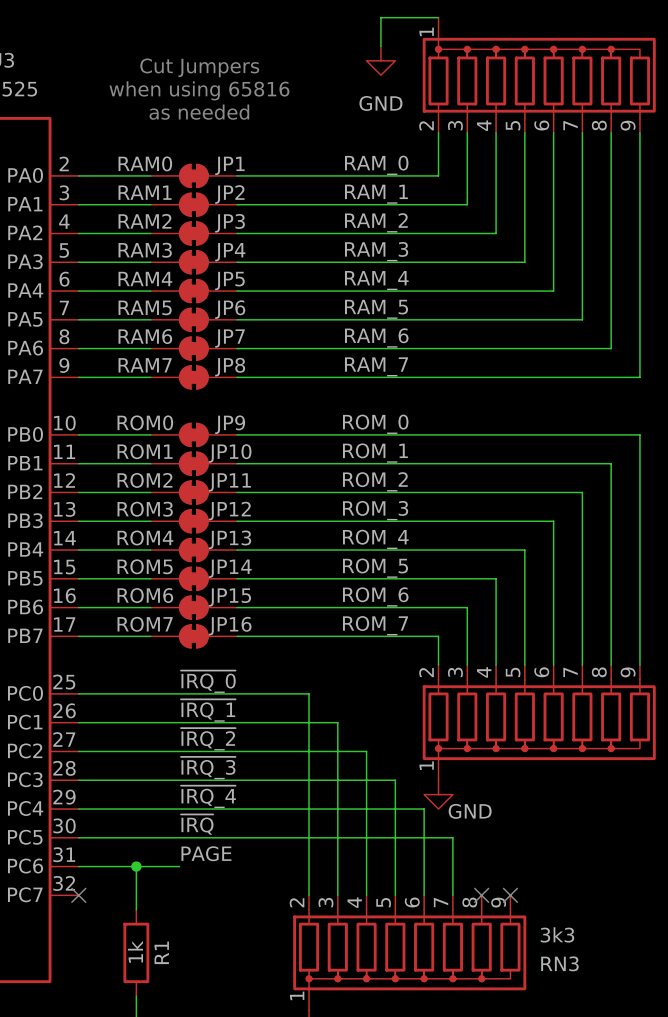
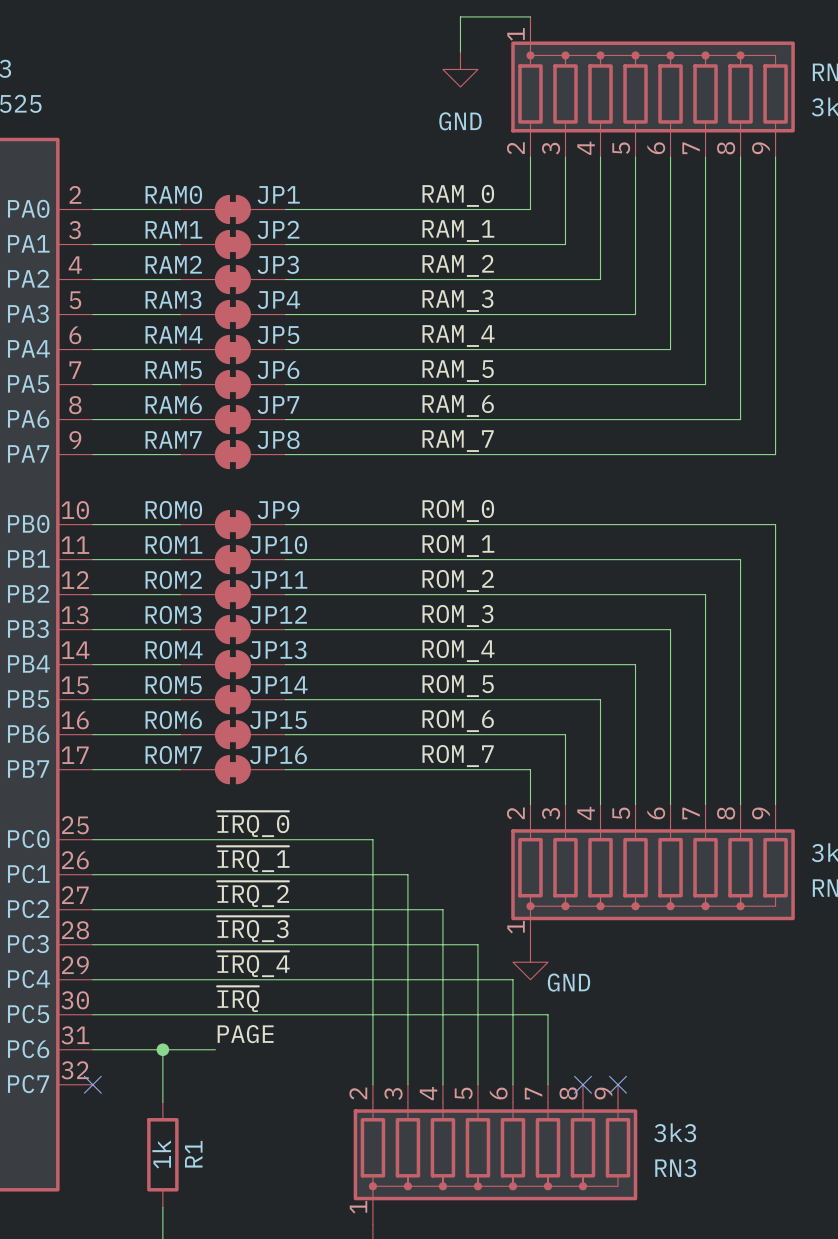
text: Cut Jumpers (199, 67) -> none
text: when using 65816 (199, 90) -> none
text: as needed (199, 112) -> none

